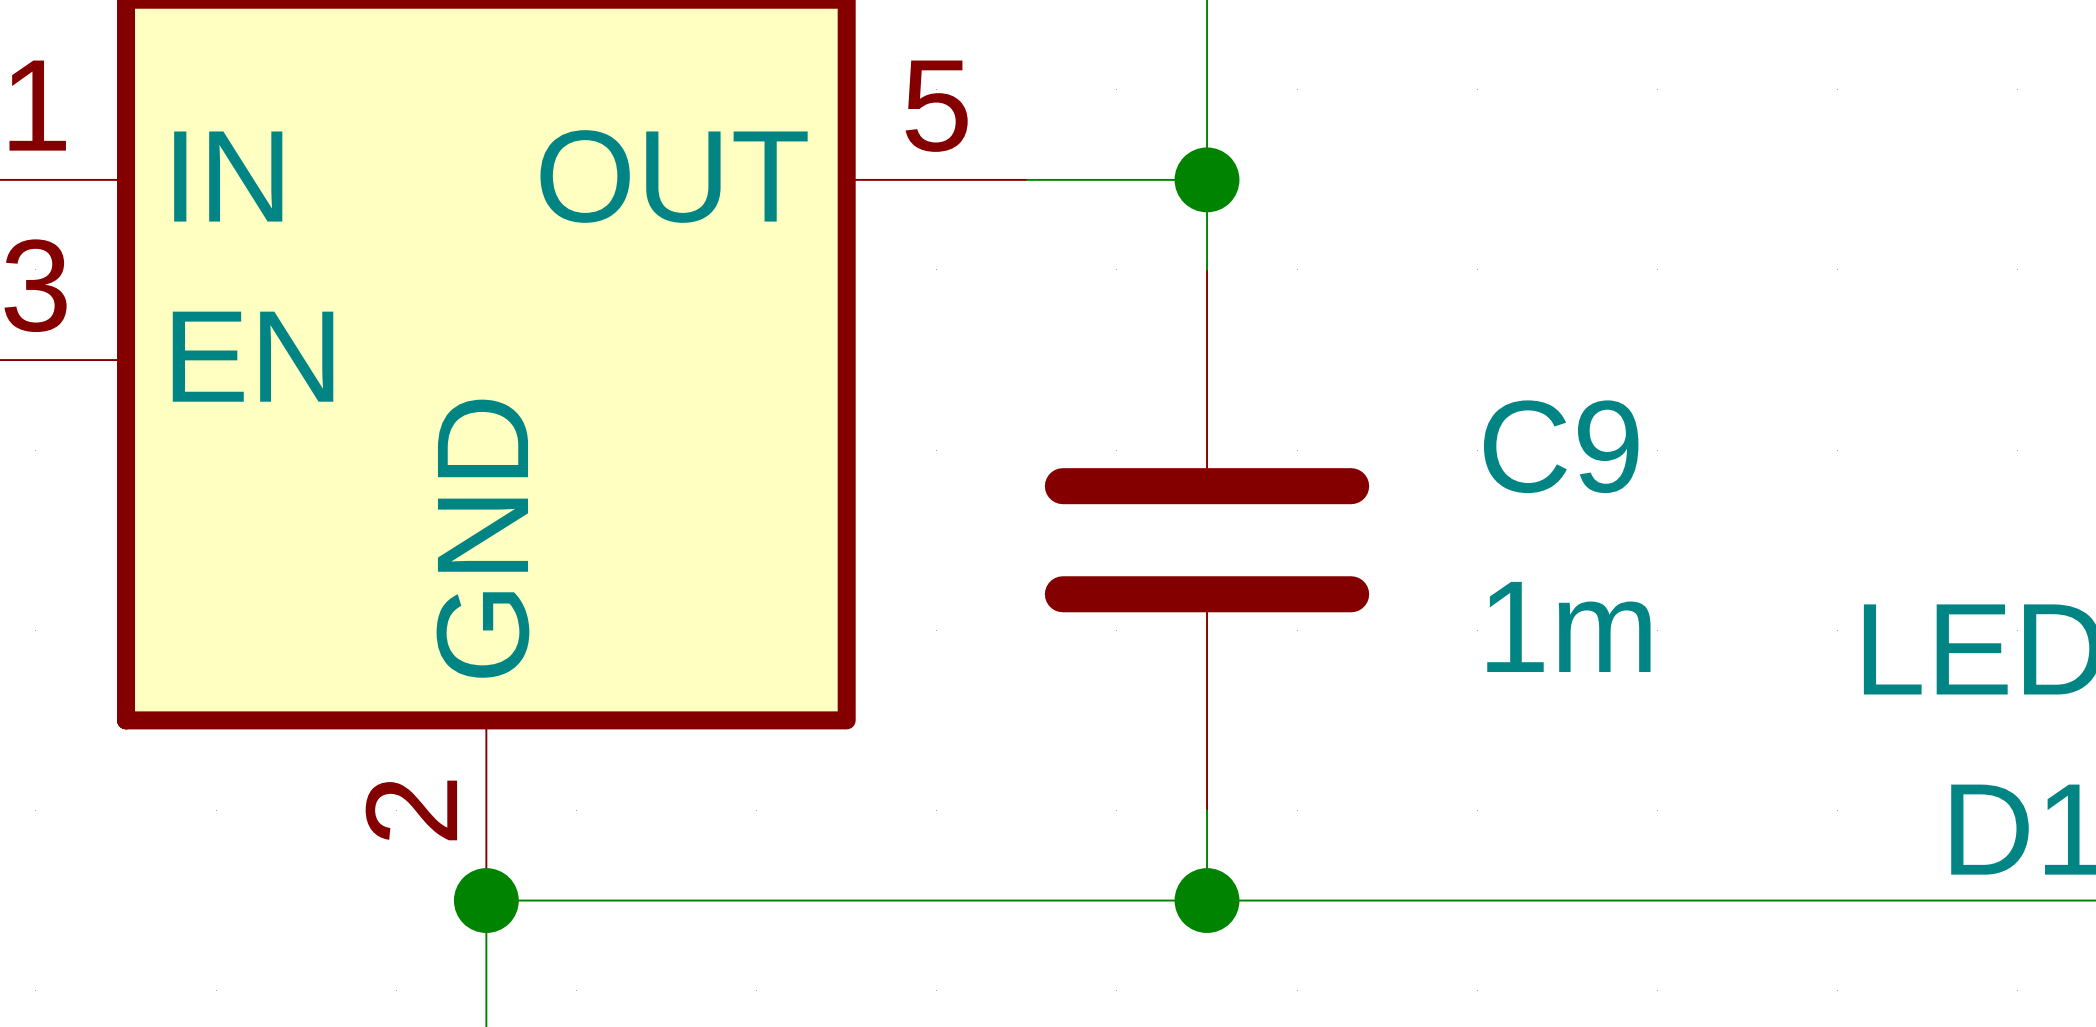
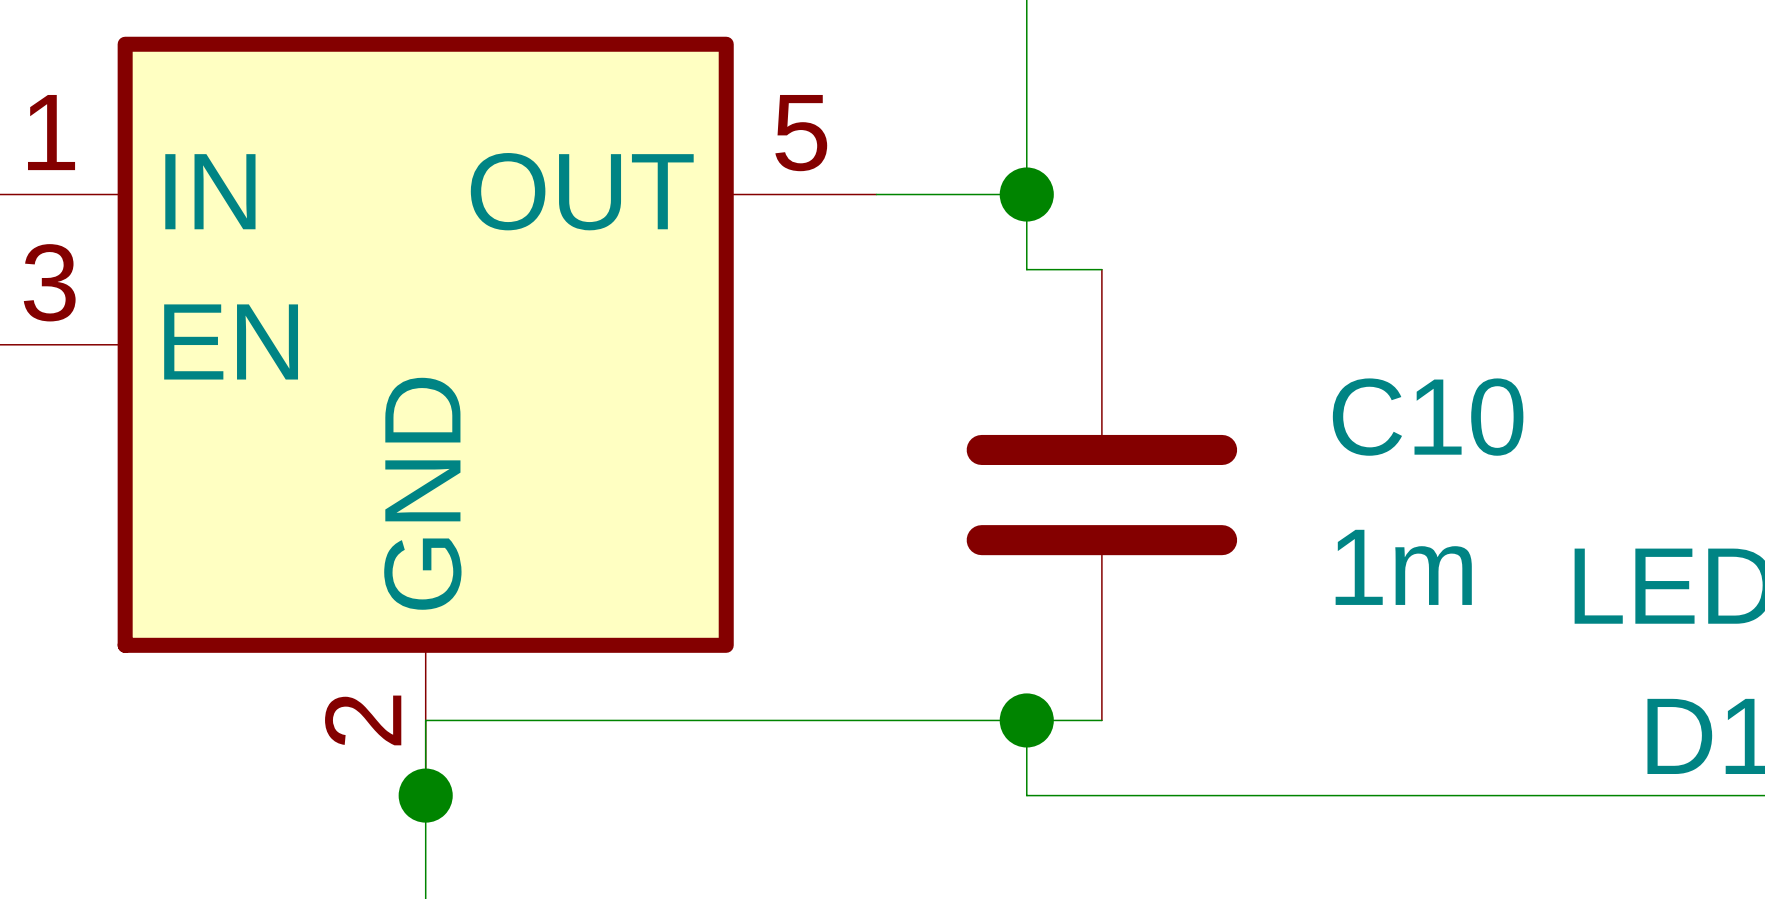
wire: none -> (1026, 269) (1101, 269)
C9: 1m (1207, 540) -> none
C10: none -> 1m (1101, 495)
wire: (486, 900) (1207, 900) -> (425, 795) (425, 720) (1101, 720)
junction position: (1207, 900) -> (1026, 720)

